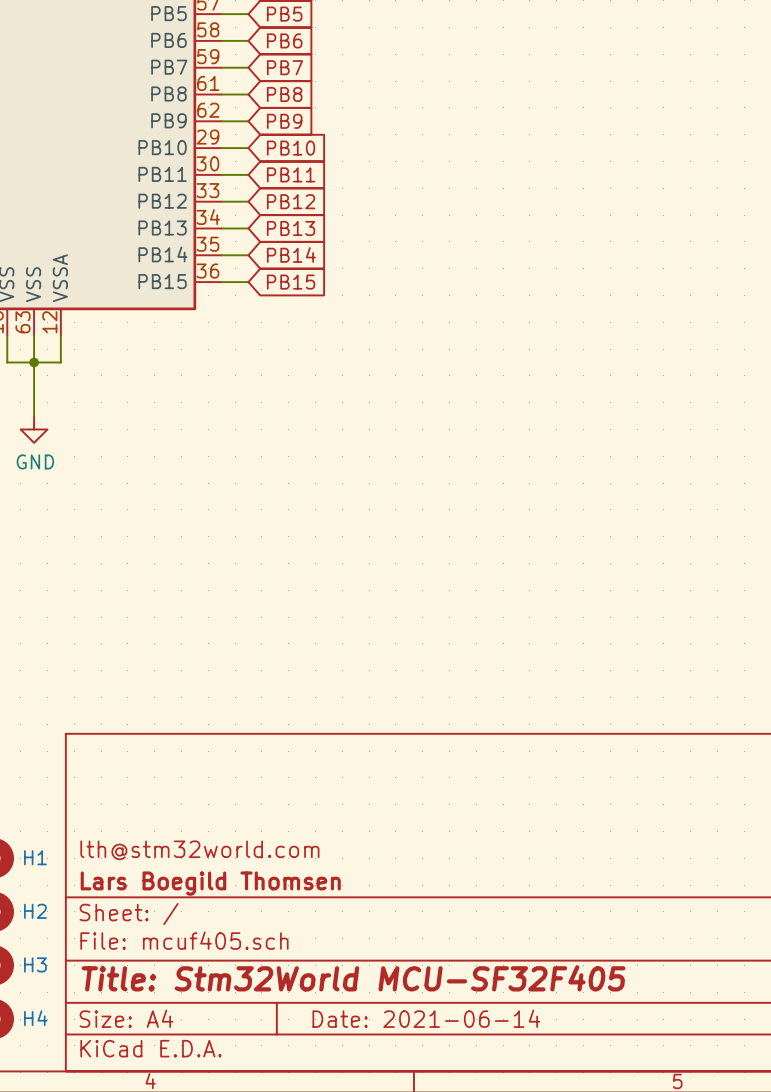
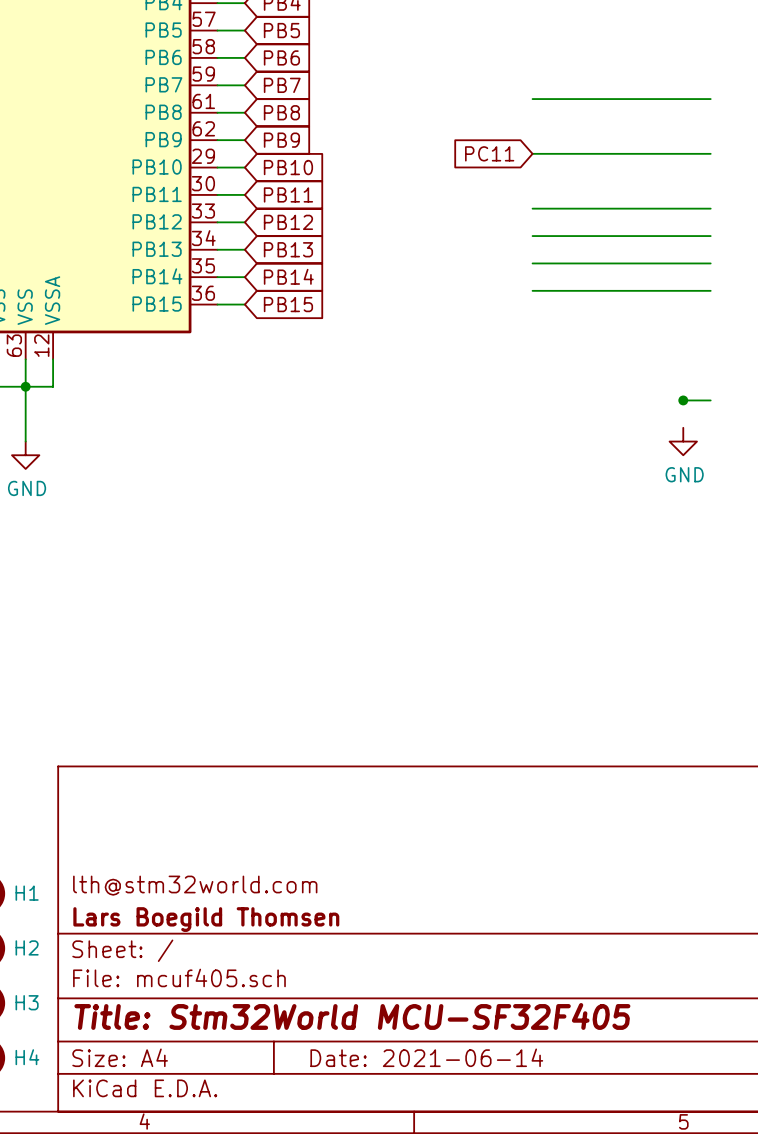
wire: none -> (532, 99) (710, 99)
global label: none -> PC11 (489, 153)
wire: none -> (532, 153) (710, 153)
wire: none -> (532, 208) (710, 208)
wire: none -> (532, 236) (710, 236)
wire: none -> (532, 263) (710, 263)
wire: none -> (532, 290) (710, 290)
wire: none -> (683, 400) (710, 400)
junction: none -> (683, 400)
power symbol: none -> GND (683, 441)

